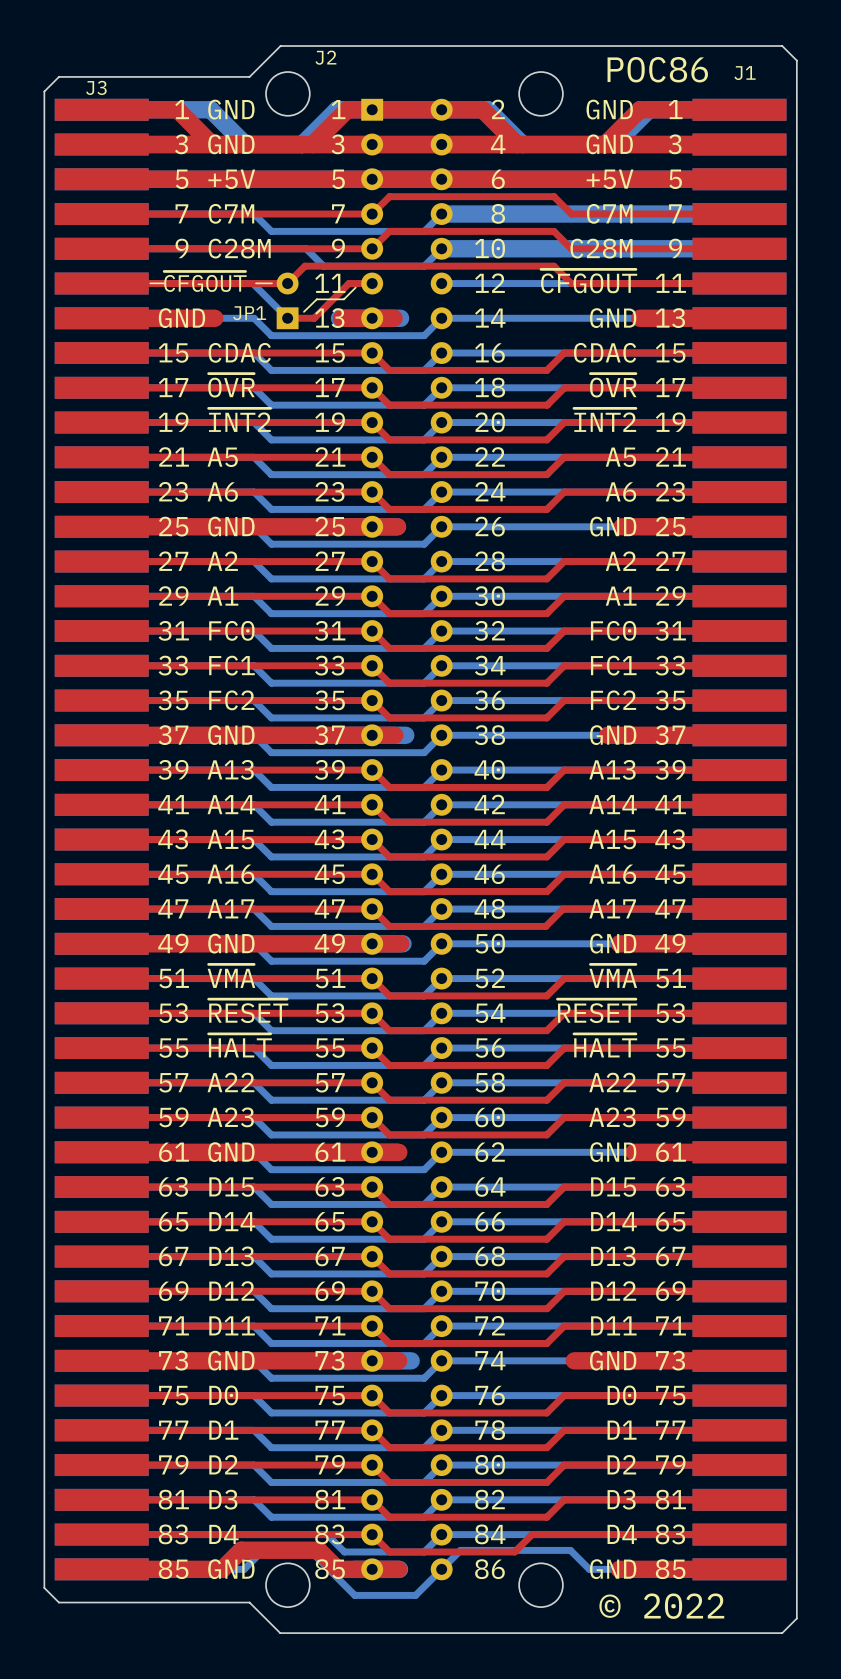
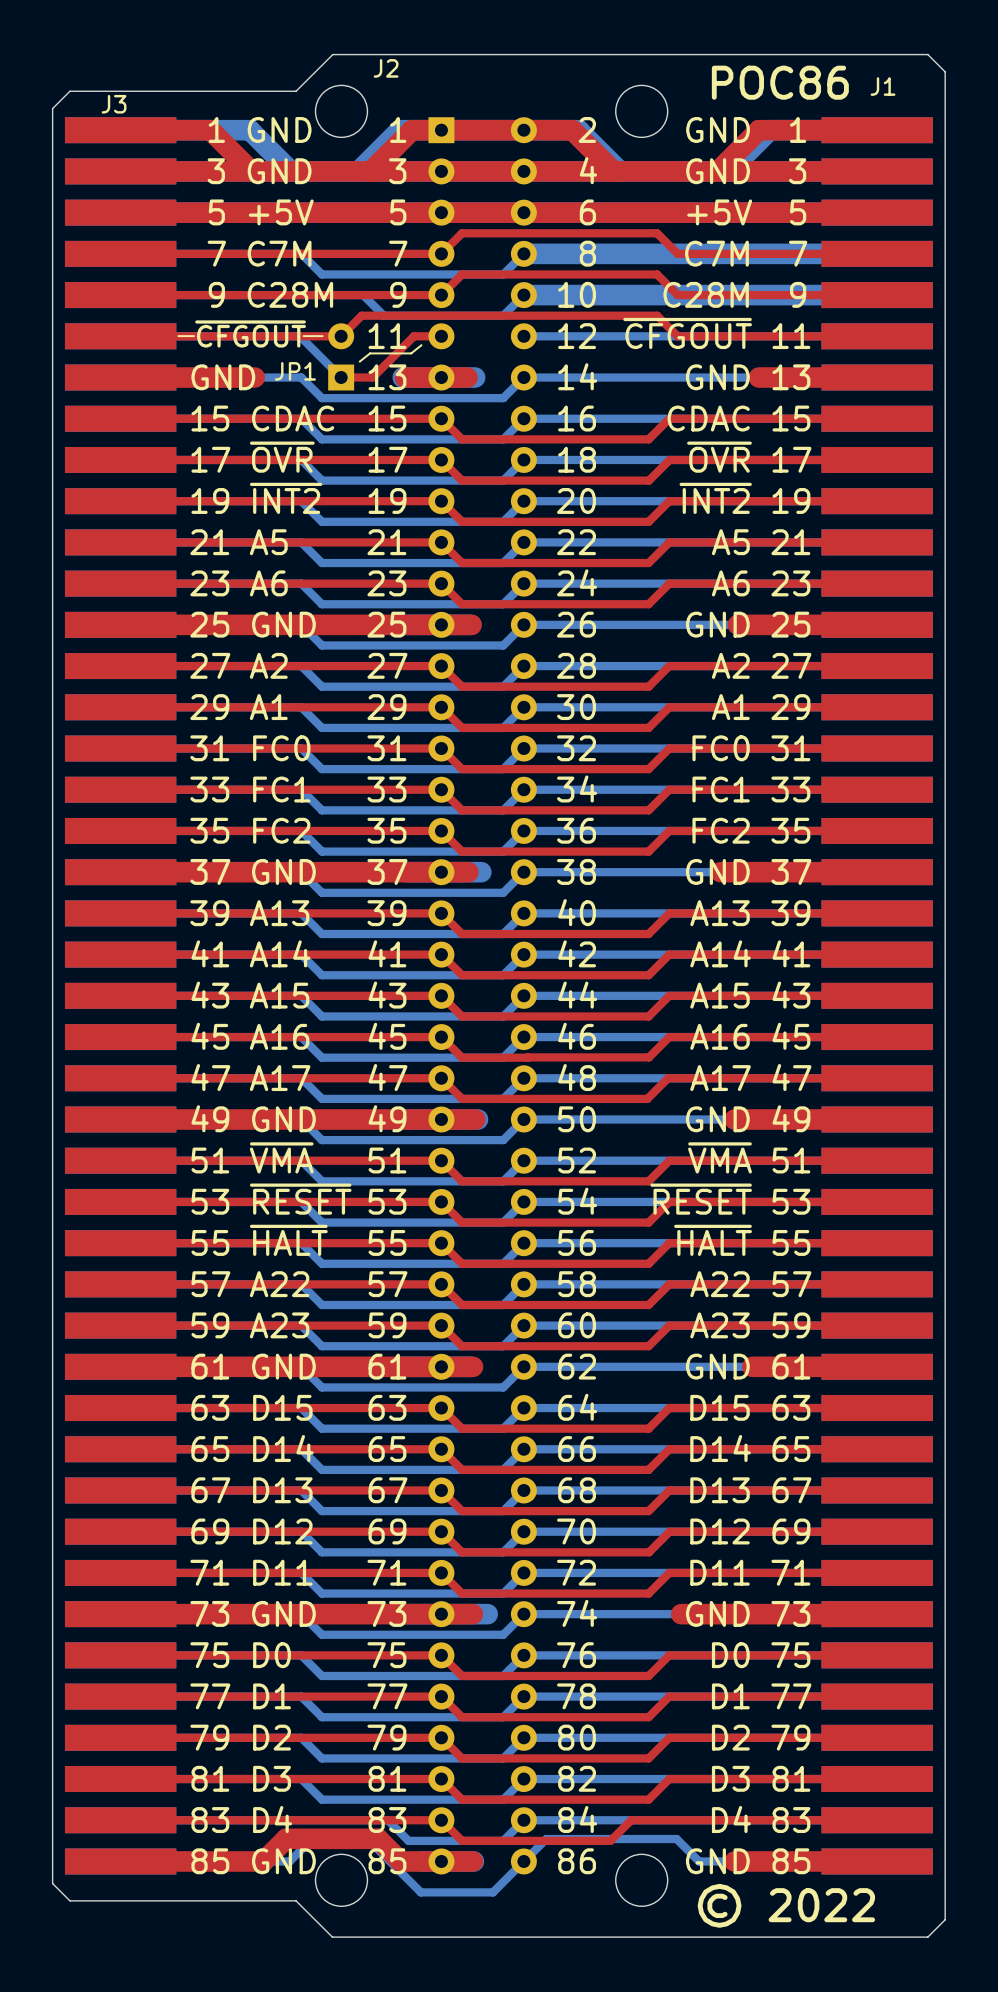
line: (355, 287) (343, 299) (316, 299) (303, 311) -> none
line: none -> (421, 345) (411, 353) (370, 353) (359, 361)

